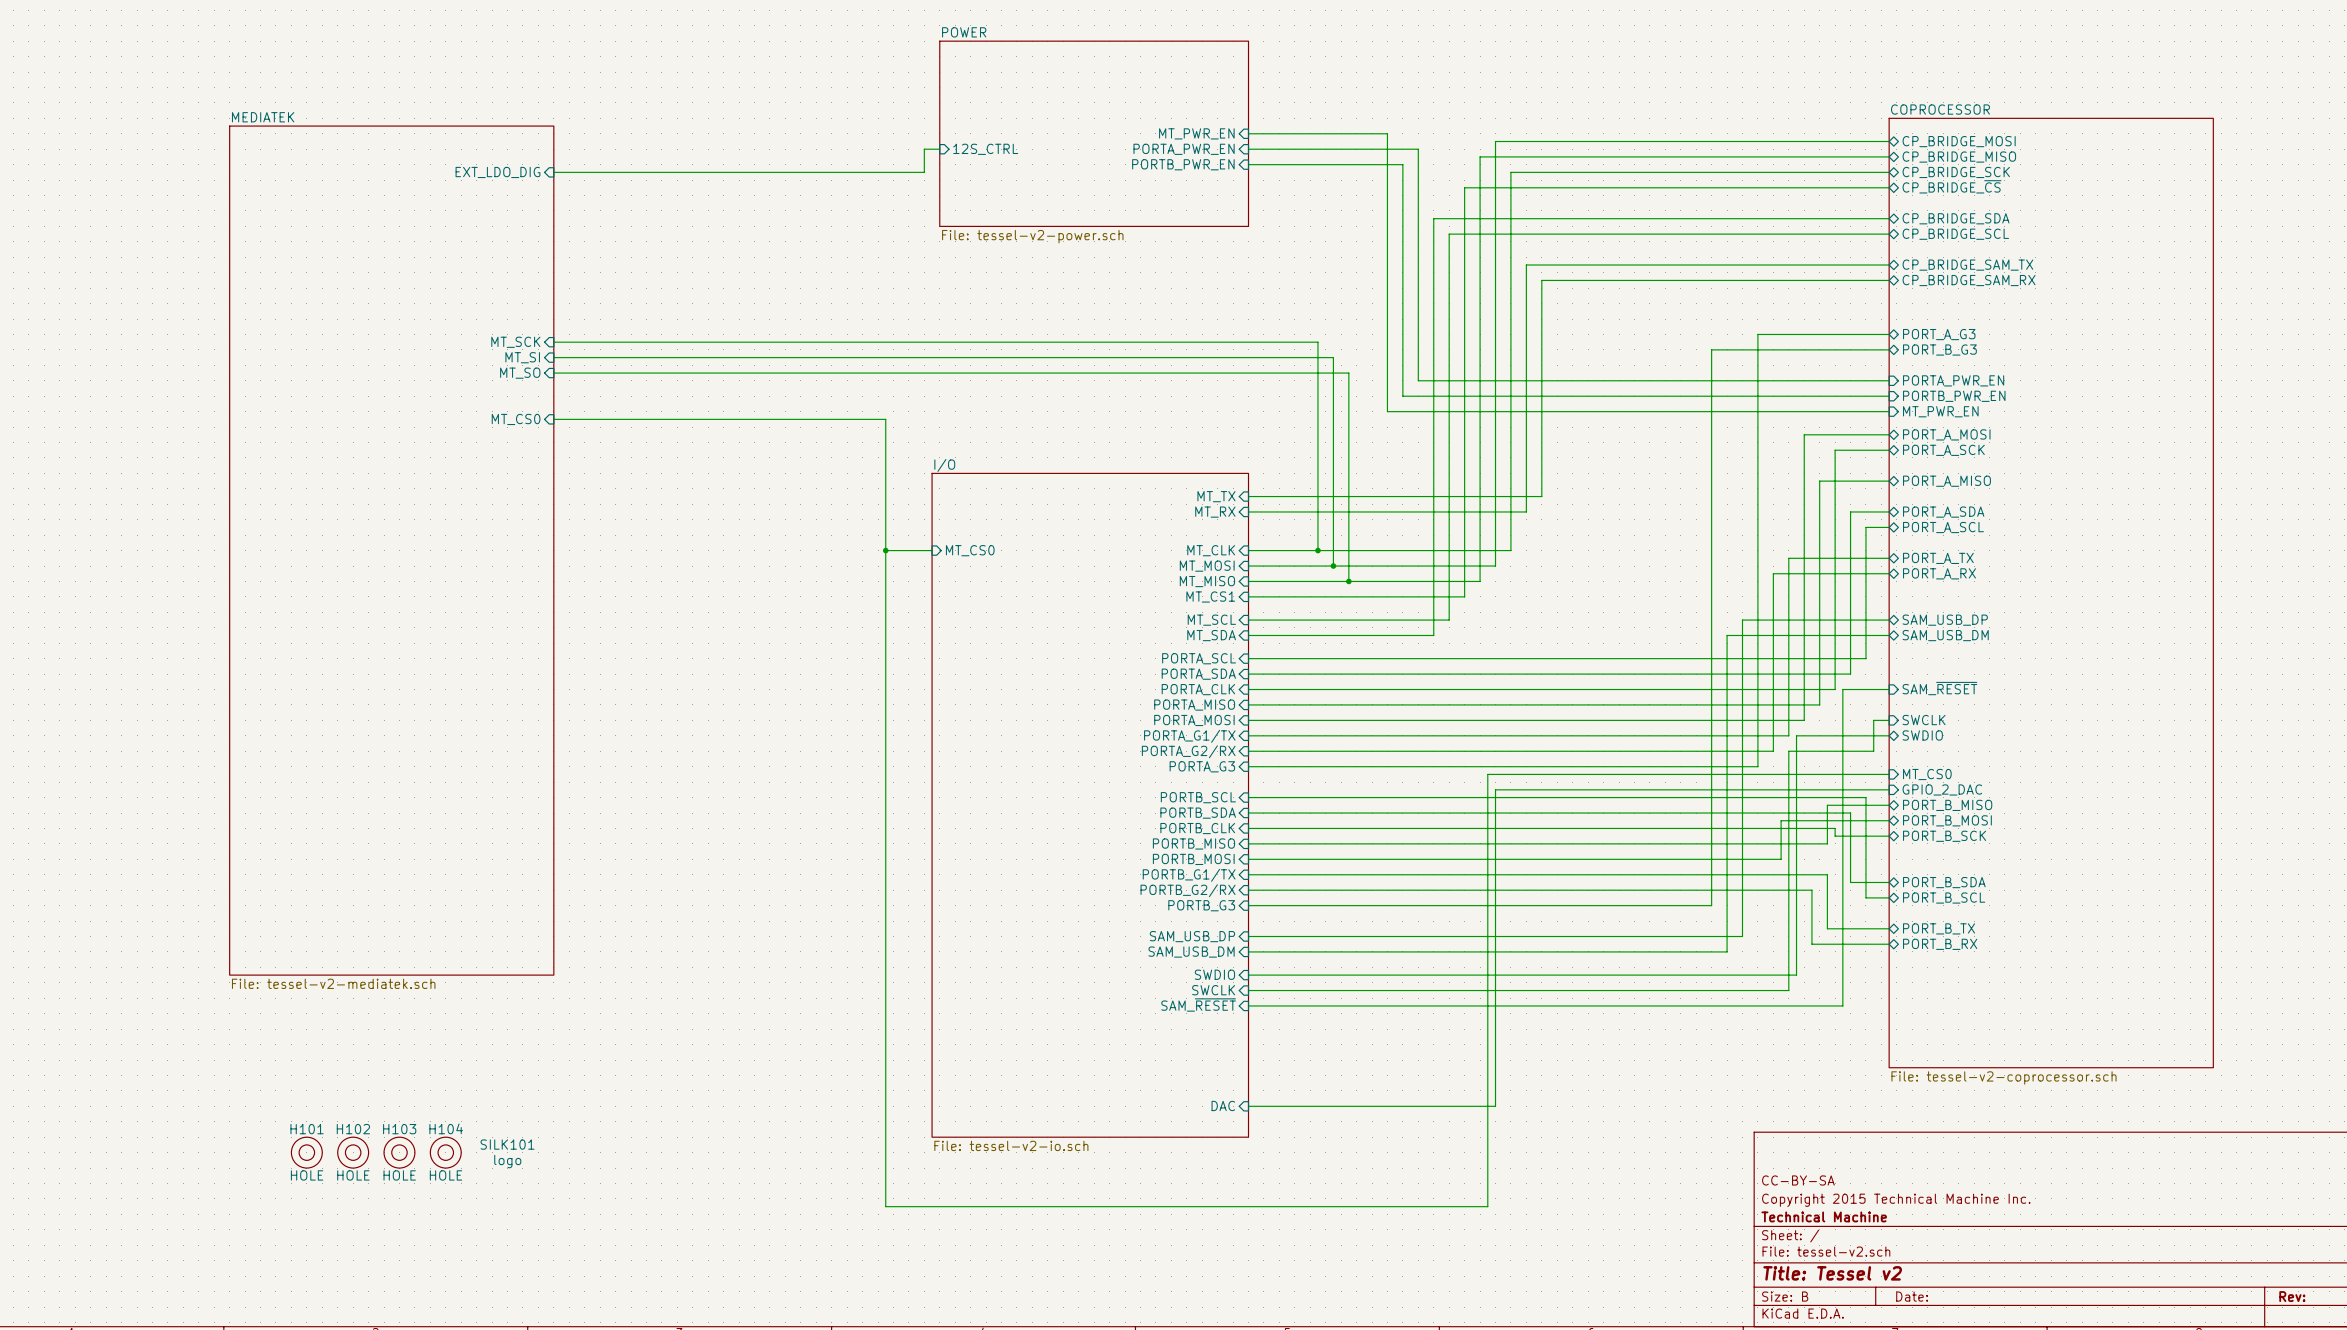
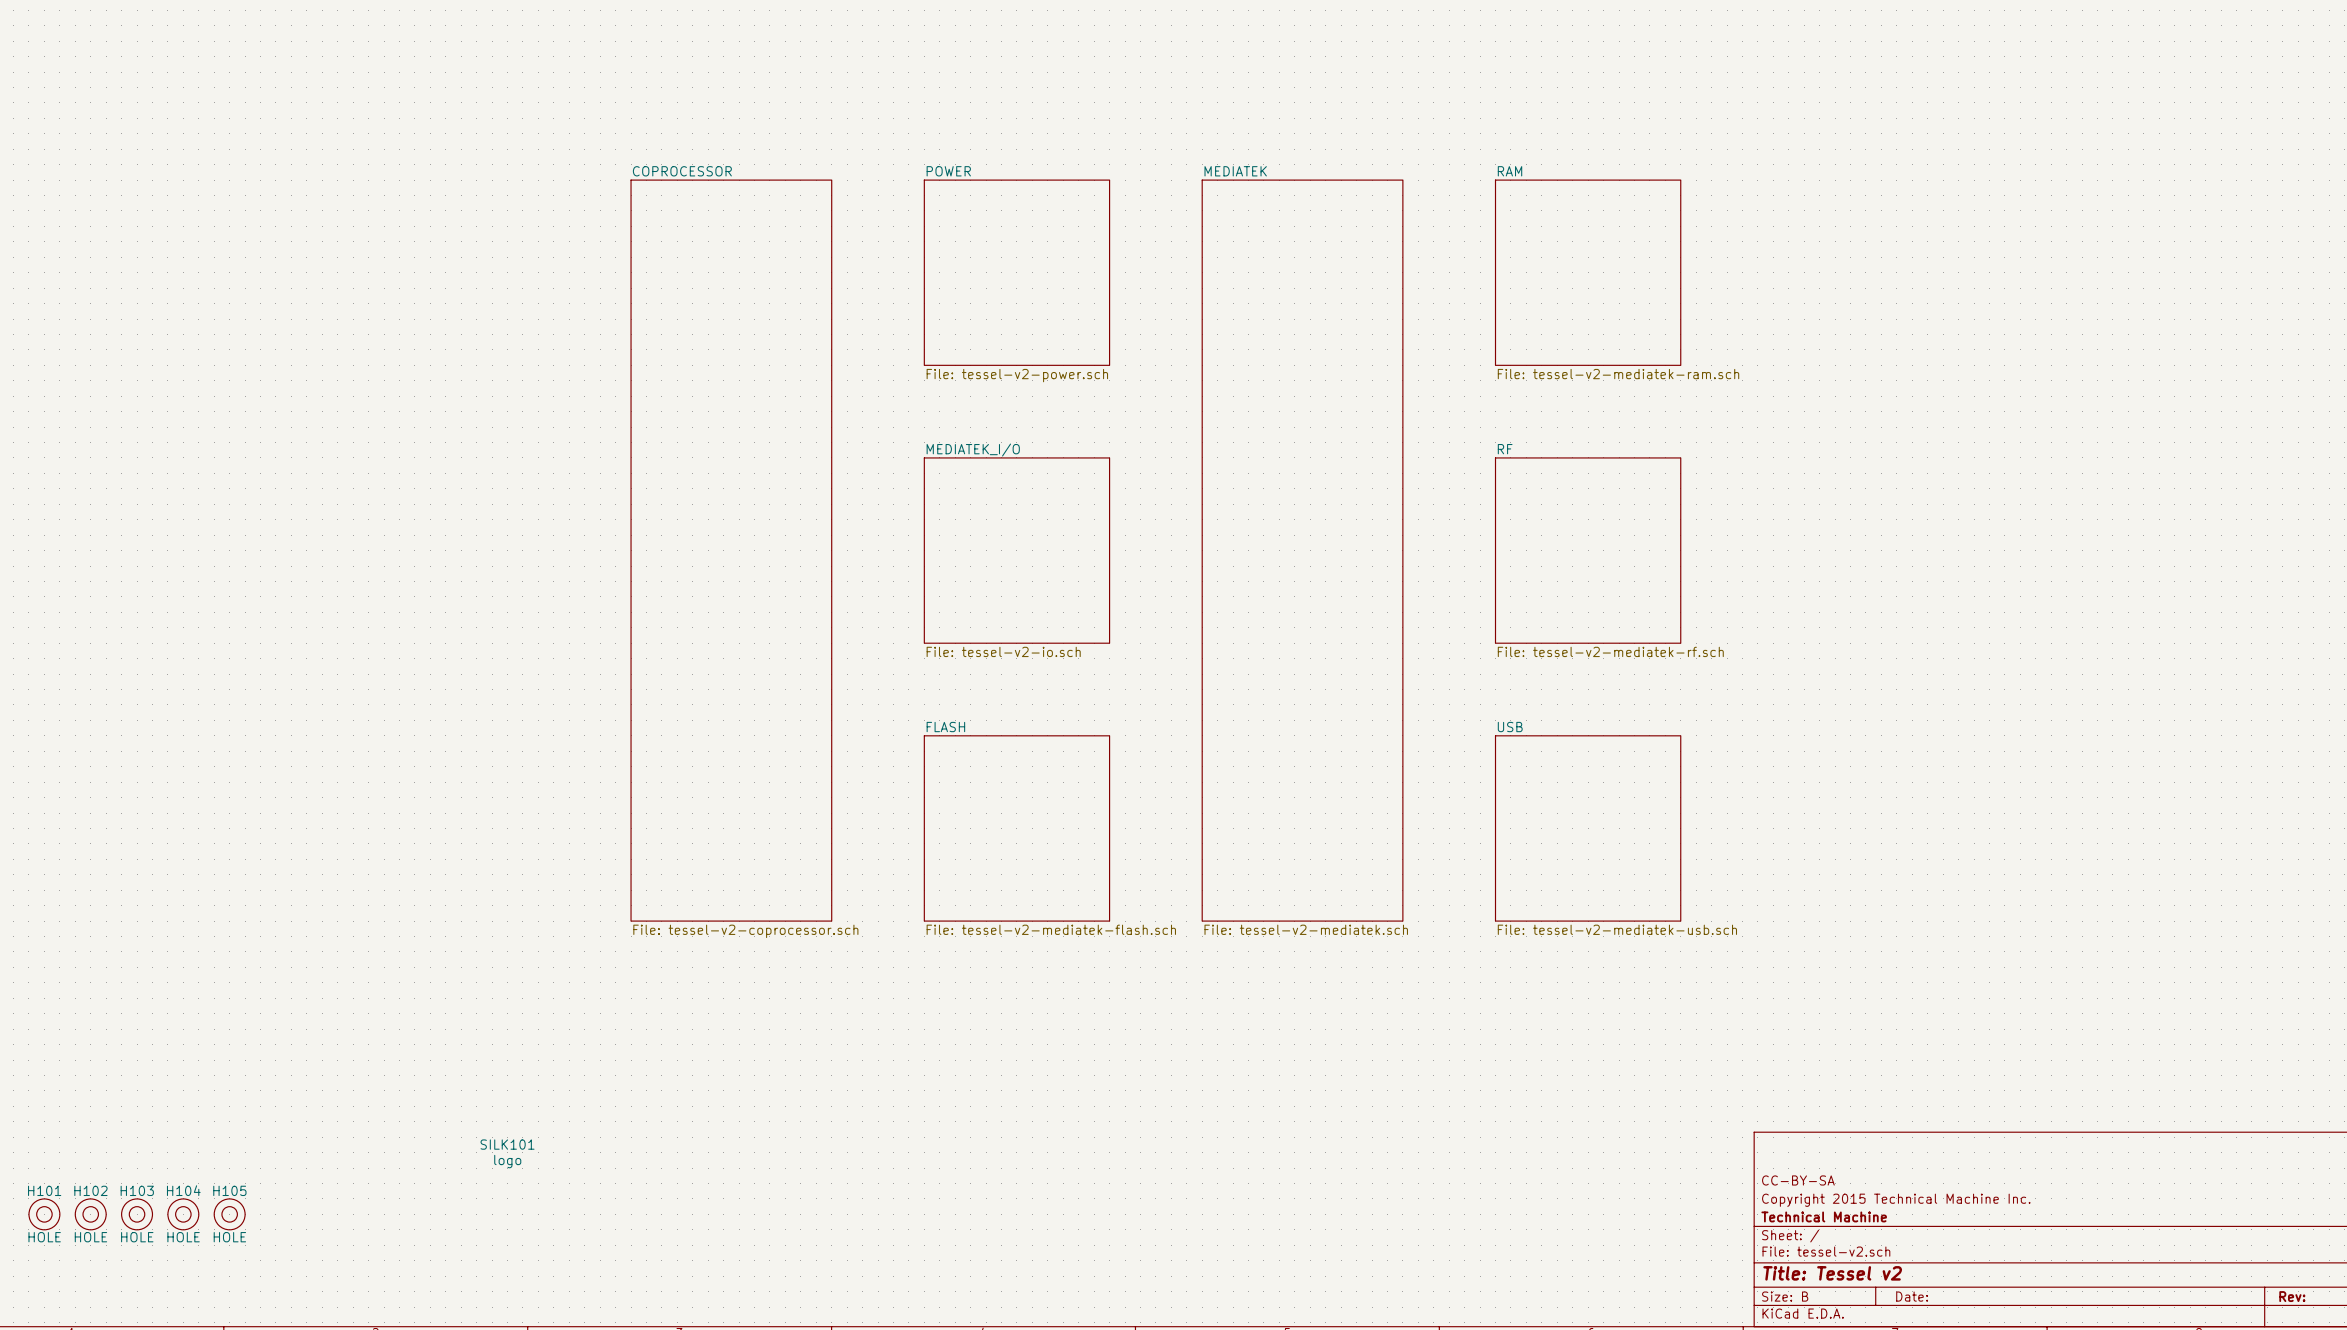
sheet POWER: File: tessel-v2-power.sch (1094, 133) -> none
sheet pin: MT_PWR_EN (1196, 133) -> none
wire: (1248, 133) (1387, 133) (1387, 411) (1889, 411) -> none
wire: (1889, 141) (1495, 141) (1495, 566) (1248, 566) -> none
sheet pin: CP_BRIDGE_MOSI (1959, 141) -> none
wire: (939, 149) (924, 149) (924, 172) (553, 172) -> none
sheet pin: 12S_CTRL (985, 149) -> none
sheet pin: PORTA_PWR_EN (1184, 149) -> none
wire: (1248, 149) (1418, 149) (1418, 380) (1889, 380) -> none
wire: (1889, 156) (1480, 156) (1480, 581) (1248, 581) -> none
sheet pin: CP_BRIDGE_MISO (1959, 157) -> none
sheet pin: PORTB_PWR_EN (1183, 164) -> none
wire: (1248, 164) (1402, 164) (1402, 396) (1889, 396) -> none
sheet pin: EXT_LDO_DIG (497, 172) -> none
wire: (1889, 172) (1510, 172) (1510, 550) (1248, 550) -> none
sheet pin: CP_BRIDGE_SCK (1956, 172) -> none
sheet pin: CP_BRIDGE_~{CS} (1952, 186) -> none
wire: (1889, 187) (1464, 187) (1464, 596) (1248, 596) -> none
wire: (1889, 218) (1433, 218) (1433, 635) (1248, 635) -> none
sheet pin: CP_BRIDGE_SDA (1956, 218) -> none
wire: (1889, 234) (1449, 234) (1449, 620) (1248, 620) -> none
sheet pin: CP_BRIDGE_SCL (1955, 234) -> none
wire: (1889, 264) (1526, 264) (1526, 511) (1248, 511) -> none
sheet pin: CP_BRIDGE_SAM_TX (1967, 265) -> none
sheet POWER: none -> File: tessel-v2-power.sch (1016, 272)
sheet RAM: none -> File: tessel-v2-mediatek-ram.sch (1588, 272)
wire: (1889, 280) (1541, 280) (1541, 496) (1248, 496) -> none
sheet pin: CP_BRIDGE_SAM_RX (1969, 280) -> none
wire: (1889, 334) (1757, 334) (1757, 766) (1248, 766) -> none
sheet pin: PORT_A_G3 (1939, 334) -> none
sheet pin: MT_SCK (515, 342) -> none
wire: (553, 342) (1317, 342) (1317, 550) -> none
wire: (1889, 349) (1711, 349) (1711, 905) (1248, 905) -> none
sheet pin: PORT_B_G3 (1939, 349) -> none
sheet pin: MT_SI (522, 357) -> none
wire: (553, 357) (1333, 357) (1333, 566) -> none
sheet pin: MT_SO (520, 373) -> none
wire: (553, 373) (1348, 373) (1348, 581) -> none
sheet pin: PORTA_PWR_EN (1953, 380) -> none
sheet pin: PORTB_PWR_EN (1954, 396) -> none
sheet pin: MT_PWR_EN (1940, 411) -> none
sheet pin: MT_CS0 (516, 419) -> none
wire: (553, 419) (885, 419) (885, 1206) (1487, 1206) (1487, 774) (1889, 774) -> none
wire: (1889, 434) (1804, 434) (1804, 720) (1248, 720) -> none
sheet pin: PORT_A_MOSI (1946, 434) -> none
wire: (1889, 450) (1835, 450) (1835, 689) (1248, 689) -> none
sheet pin: PORT_A_SCK (1943, 450) -> none
wire: (1889, 481) (1819, 481) (1819, 704) (1248, 704) -> none
sheet pin: PORT_A_MISO (1946, 481) -> none
sheet pin: MT_TX (1216, 496) -> none
wire: (1889, 511) (1850, 511) (1850, 674) (1248, 674) -> none
sheet pin: MT_RX (1215, 512) -> none
sheet pin: PORT_A_SDA (1943, 512) -> none
wire: (1889, 527) (1865, 527) (1865, 658) (1248, 658) -> none
sheet pin: PORT_A_SCL (1943, 527) -> none
sheet MEDIATEK: File: tessel-v2-mediatek.sch (391, 550) -> none
sheet COPROCESSOR: none -> File: tessel-v2-coprocessor.sch (731, 550)
wire: (885, 550) (932, 550) -> none
junction: (885, 550) -> none
sheet pin: MT_CS0 (970, 550) -> none
sheet MEDIATEK_I/O: none -> File: tessel-v2-io.sch (1016, 550)
sheet pin: MT_CLK (1211, 550) -> none
sheet MEDIATEK: none -> File: tessel-v2-mediatek.sch (1302, 550)
junction: (1317, 550) -> none
sheet RF: none -> File: tessel-v2-mediatek-rf.sch (1588, 550)
wire: (1889, 558) (1788, 558) (1788, 735) (1248, 735) -> none
sheet pin: PORT_A_TX (1938, 558) -> none
sheet pin: MT_MOSI (1207, 566) -> none
junction: (1333, 566) -> none
wire: (1889, 573) (1773, 573) (1773, 751) (1248, 751) -> none
sheet pin: PORT_A_RX (1939, 573) -> none
sheet pin: MT_MISO (1207, 581) -> none
junction: (1348, 581) -> none
sheet COPROCESSOR: File: tessel-v2-coprocessor.sch (2051, 593) -> none
sheet pin: MT_CS1 (1210, 596) -> none
sheet pin: MT_SCL (1211, 620) -> none
wire: (1889, 620) (1742, 620) (1742, 936) (1248, 936) -> none
sheet pin: SAM_USB_DP (1945, 620) -> none
sheet pin: MT_SDA (1211, 635) -> none
wire: (1889, 635) (1727, 635) (1727, 951) (1248, 951) -> none
sheet pin: SAM_USB_DM (1945, 635) -> none
sheet pin: PORTA_SCL (1199, 658) -> none
sheet pin: PORTA_SDA (1198, 674) -> none
sheet pin: SAM_~{RESET} (1939, 688) -> none
sheet pin: PORTA_CLK (1198, 689) -> none
wire: (1889, 689) (1842, 689) (1842, 1005) (1248, 1005) -> none
sheet pin: PORTA_MISO (1194, 705) -> none
sheet pin: PORTA_MOSI (1194, 720) -> none
wire: (1889, 720) (1873, 720) (1873, 751) (1788, 751) (1788, 990) (1248, 990) -> none
sheet pin: SWCLK (1924, 720) -> none
wire: (1889, 735) (1796, 735) (1796, 975) (1248, 975) -> none
sheet pin: SWDIO (1922, 735) -> none
sheet pin: PORTA_G1/TX (1189, 736) -> none
sheet pin: PORTA_G2/RX (1188, 751) -> none
sheet pin: PORTA_G3 (1202, 766) -> none
sheet pin: MT_CS0 (1927, 774) -> none
wire: (1889, 789) (1495, 789) (1495, 1106) (1248, 1106) -> none
sheet pin: GPIO_2_DAC (1942, 789) -> none
sheet pin: PORTB_SCL (1198, 797) -> none
wire: (1248, 797) (1865, 797) (1865, 897) (1889, 897) -> none
sheet I/O: File: tessel-v2-io.sch (1090, 805) -> none
wire: (1889, 805) (1827, 805) (1827, 843) (1248, 843) -> none
sheet pin: PORT_B_MISO (1947, 805) -> none
sheet pin: PORTB_SDA (1198, 813) -> none
wire: (1248, 813) (1850, 813) (1850, 882) (1889, 882) -> none
wire: (1889, 820) (1781, 820) (1781, 859) (1248, 859) -> none
sheet pin: PORT_B_MOSI (1947, 820) -> none
sheet FLASH: none -> File: tessel-v2-mediatek-flash.sch (1016, 828)
sheet pin: PORTB_CLK (1197, 828) -> none
wire: (1248, 828) (1835, 828) (1835, 836) (1889, 836) -> none
sheet USB: none -> File: tessel-v2-mediatek-usb.sch (1588, 828)
sheet pin: PORT_B_SCK (1944, 836) -> none
sheet pin: PORTB_MISO (1193, 843) -> none
sheet pin: PORTB_MOSI (1193, 859) -> none
wire: (1248, 874) (1827, 874) (1827, 928) (1889, 928) -> none
sheet pin: PORTB_G1/TX (1189, 875) -> none
sheet pin: PORT_B_SDA (1944, 882) -> none
sheet pin: PORTB_G2/RX (1188, 890) -> none
wire: (1248, 890) (1811, 890) (1811, 944) (1889, 944) -> none
sheet pin: PORT_B_SCL (1944, 898) -> none
sheet pin: PORTB_G3 (1201, 905) -> none
sheet pin: PORT_B_TX (1939, 928) -> none
sheet pin: SAM_USB_DP (1192, 936) -> none
sheet pin: PORT_B_RX (1940, 944) -> none
sheet pin: SAM_USB_DM (1191, 952) -> none
sheet pin: SWDIO (1214, 974) -> none
sheet pin: SWCLK (1213, 990) -> none
sheet pin: SAM_~{RESET} (1198, 1005) -> none
sheet pin: DAC (1223, 1105) -> none
H101 position: (306, 1152) -> (44, 1214)
H102 position: (353, 1152) -> (90, 1214)
H103 position: (399, 1152) -> (137, 1214)
H104 position: (445, 1152) -> (183, 1214)
H105: none -> HOLE (229, 1214)

